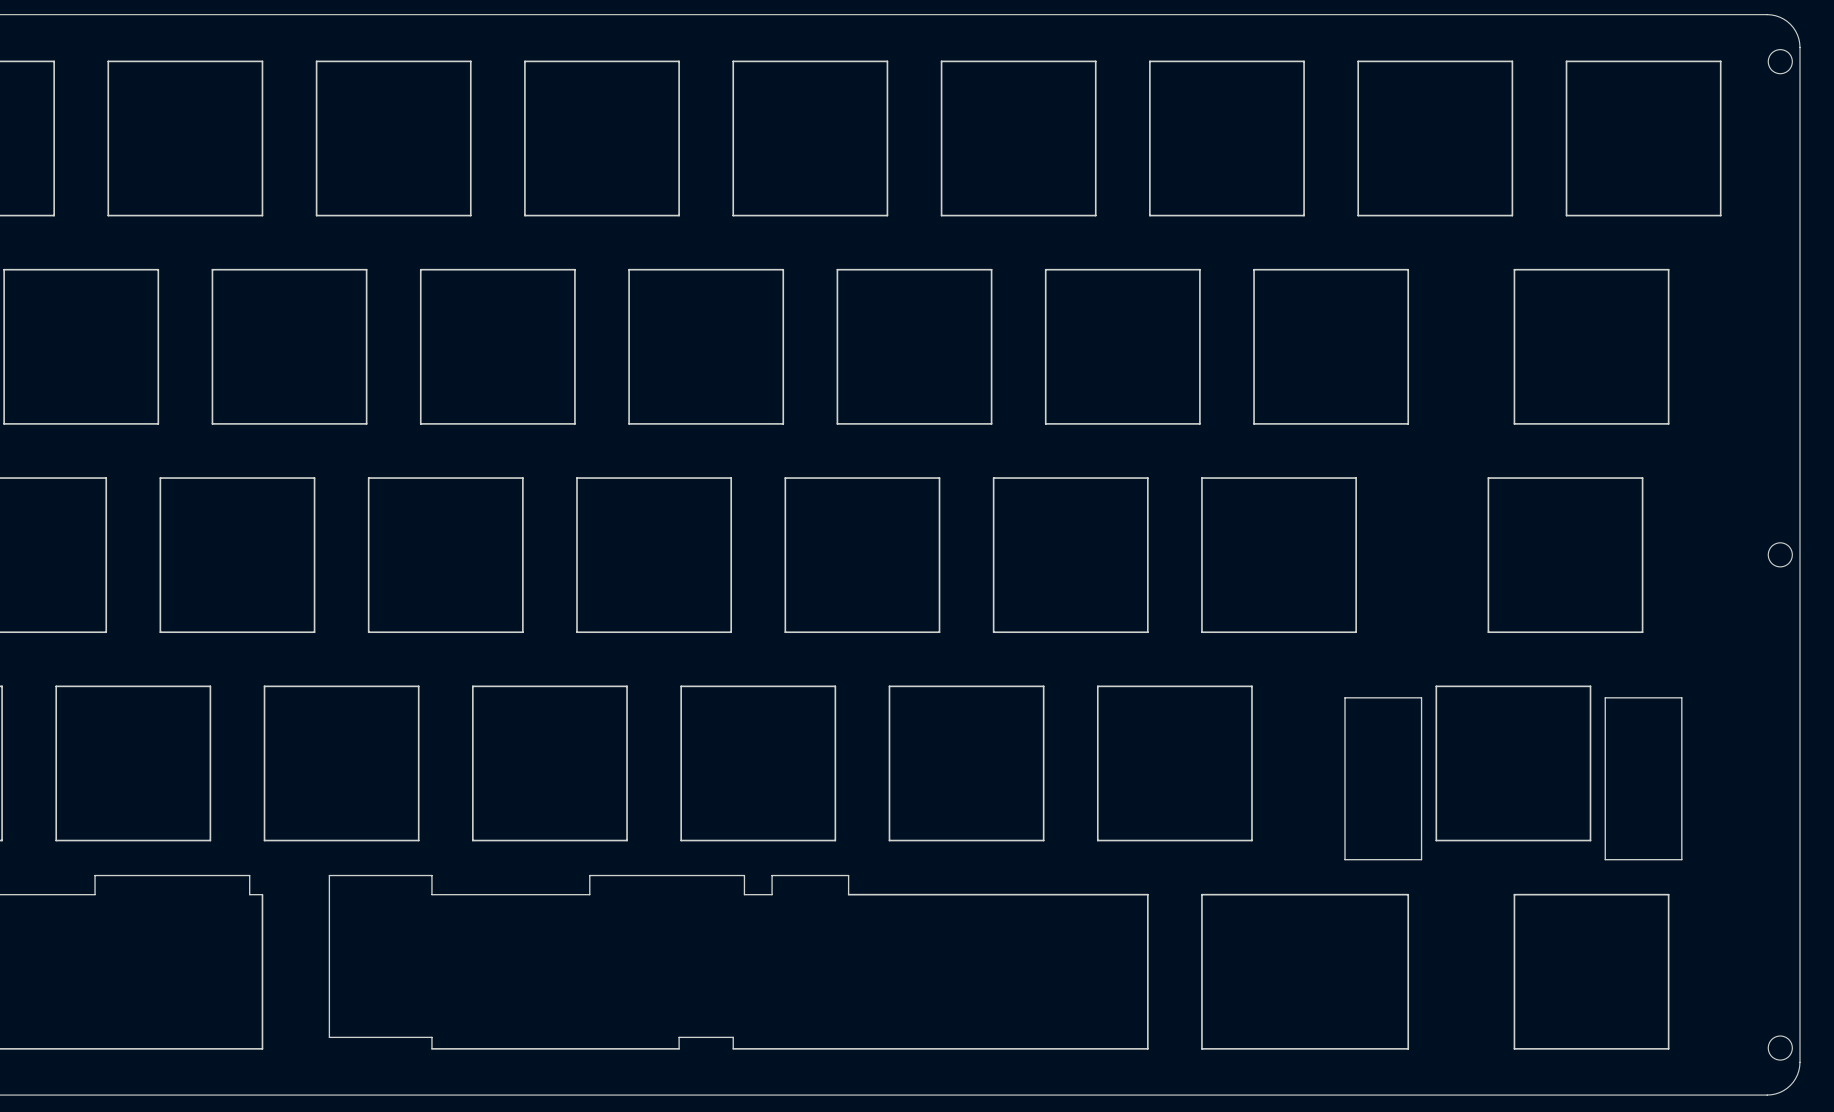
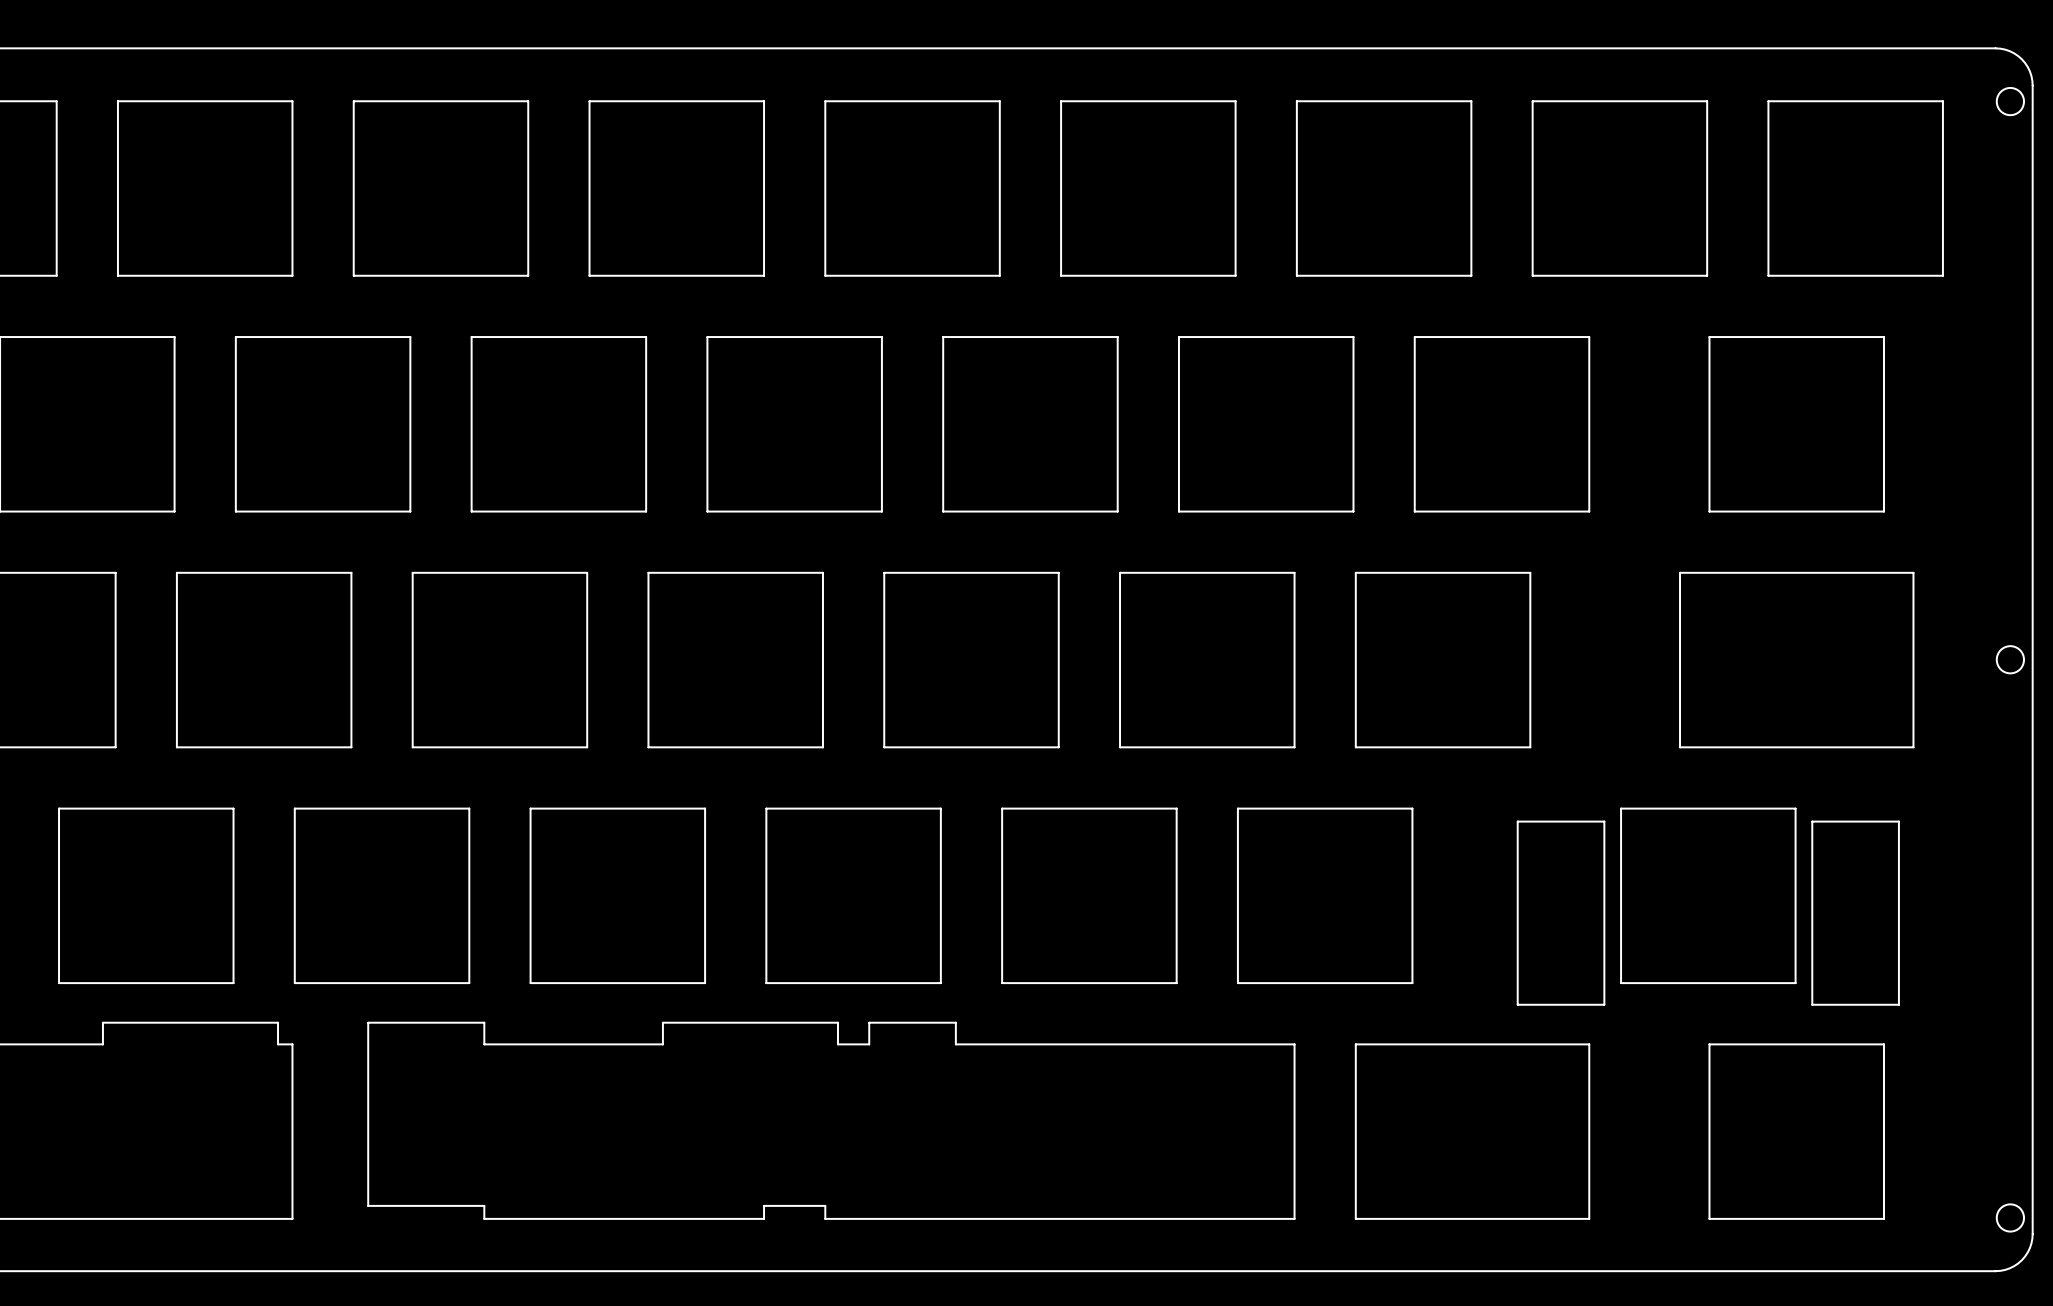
drawing: [1487, 477, 1644, 634] -> none
drawing: none -> [1679, 571, 1915, 749]

